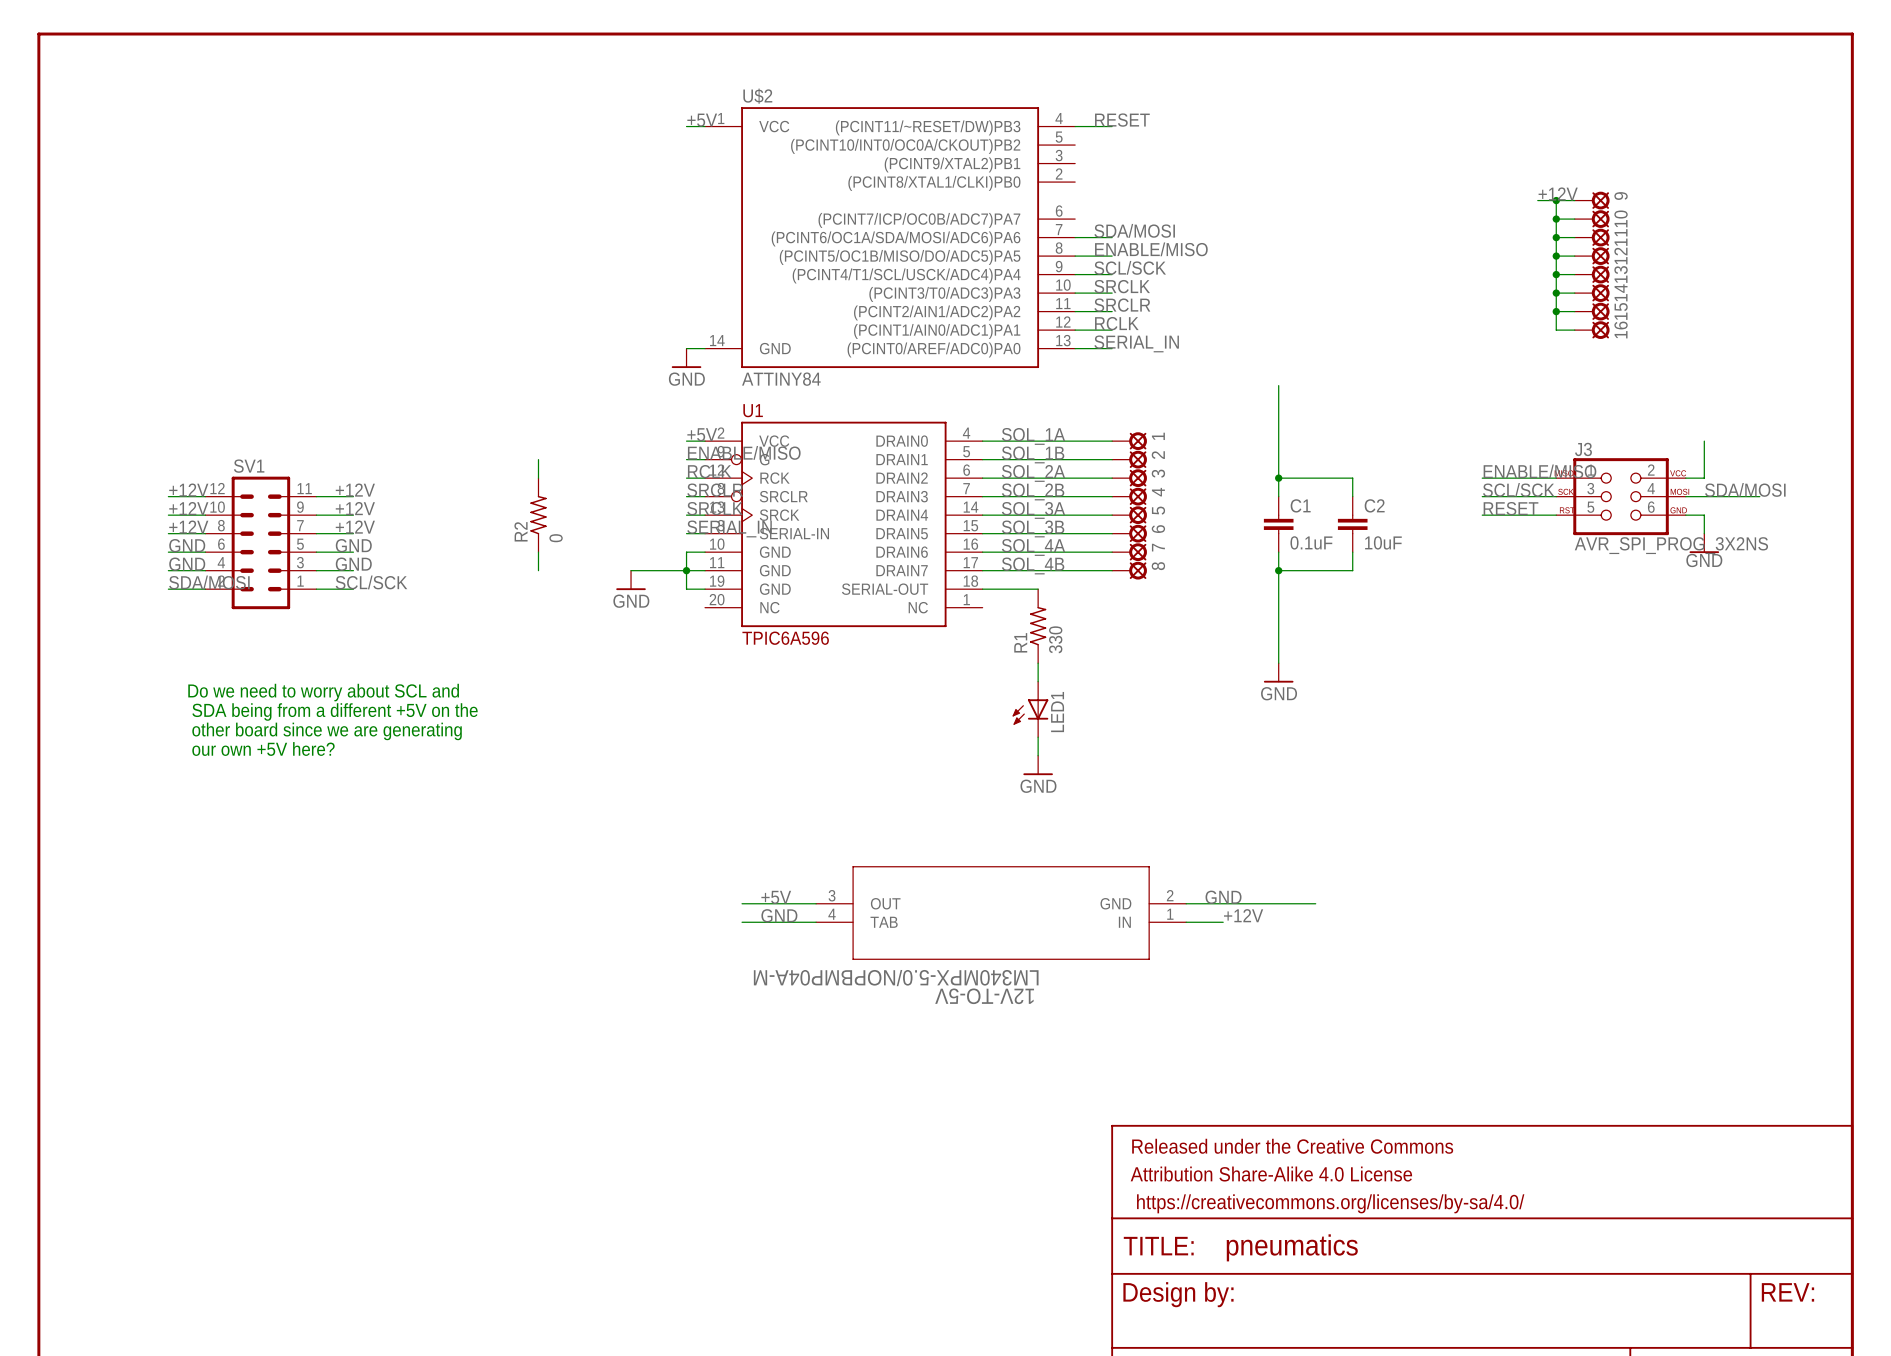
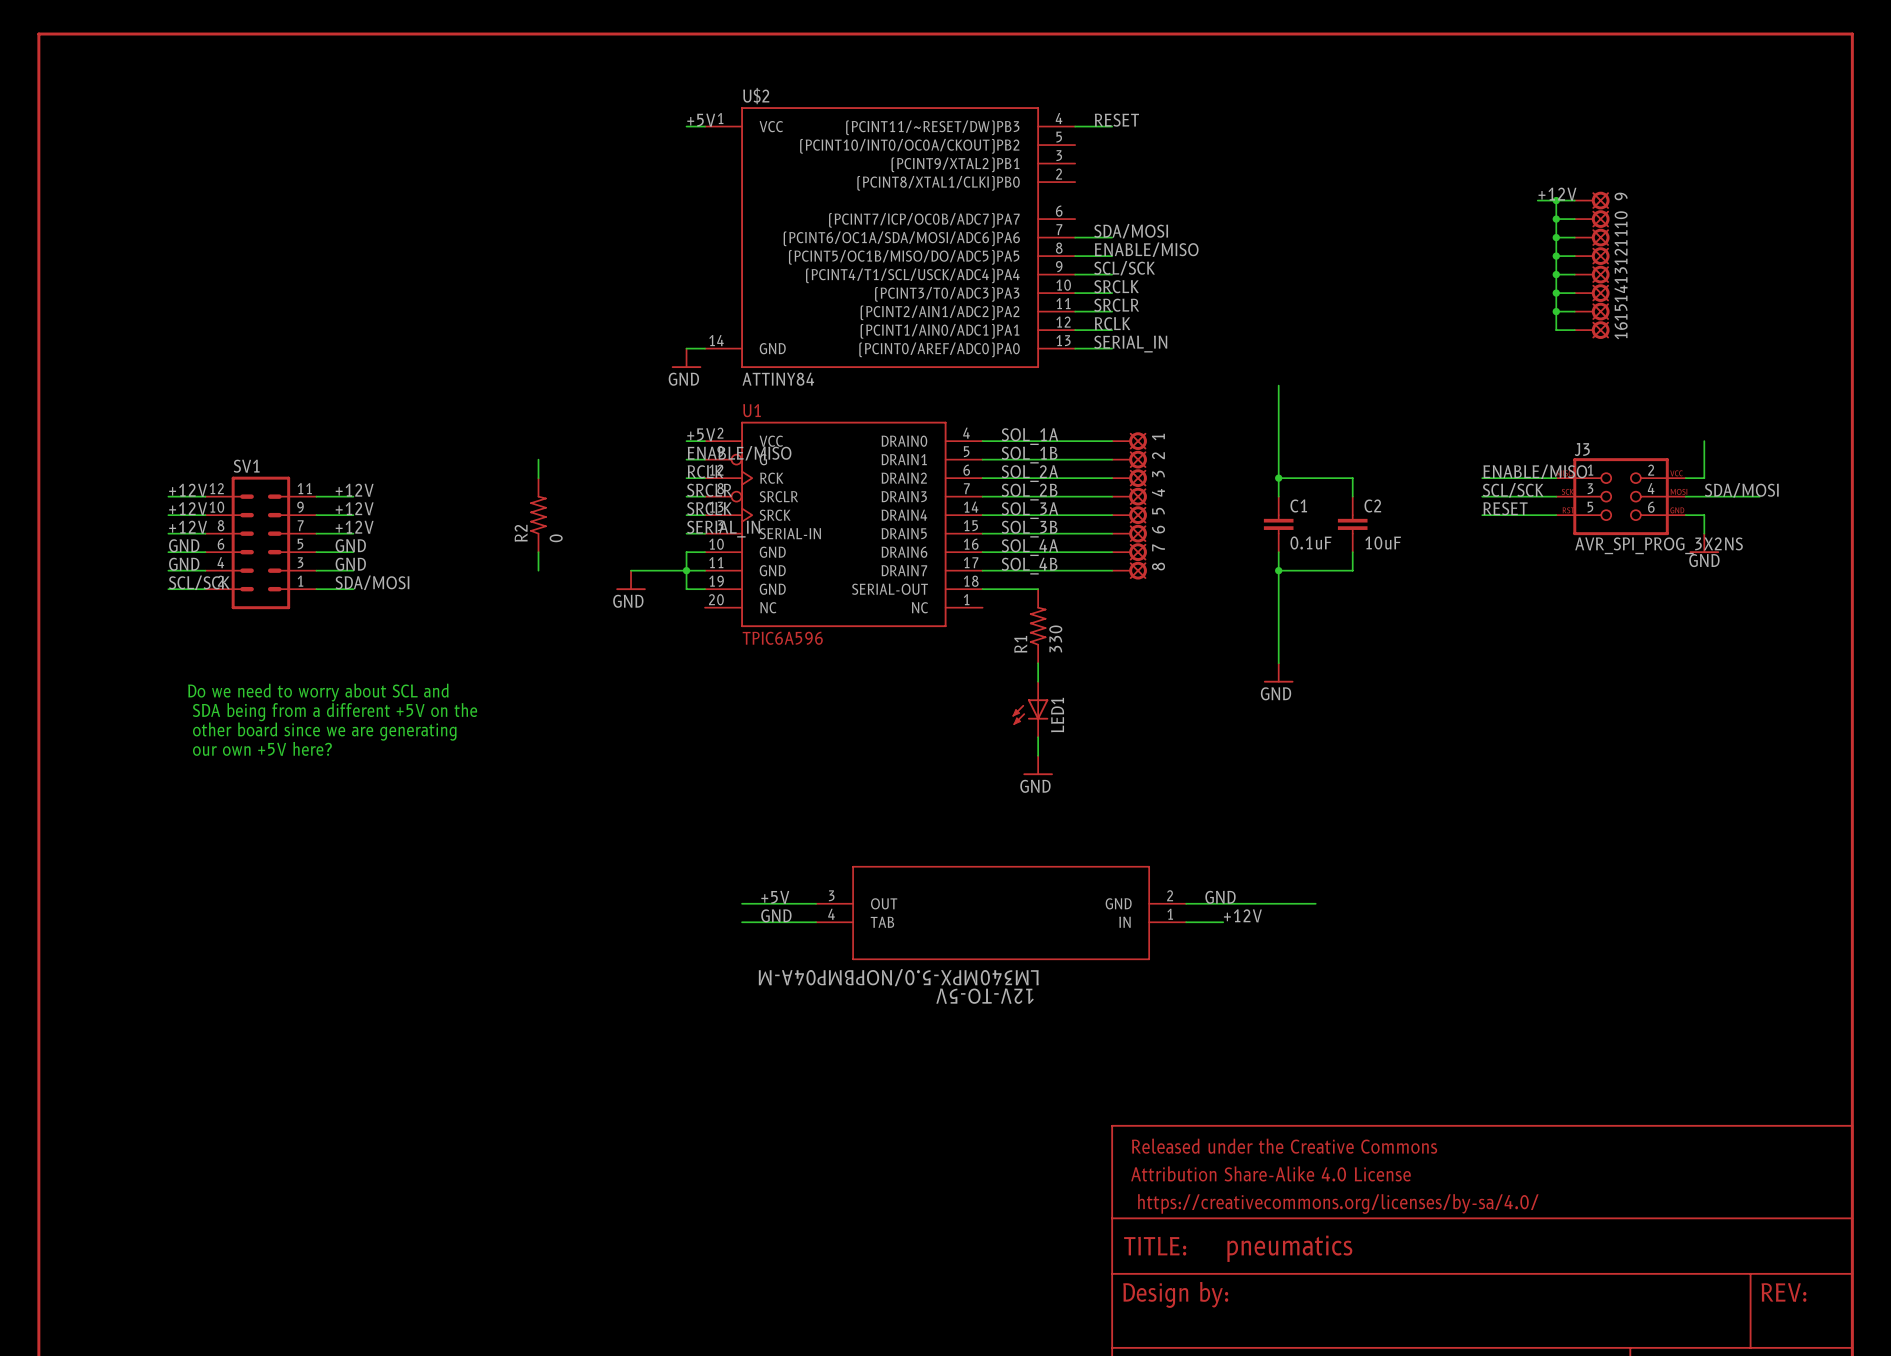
label: SDA/MOSI (209, 582) -> SCL/SCK (199, 582)
label: SCL/SCK (371, 582) -> SDA/MOSI (372, 582)

